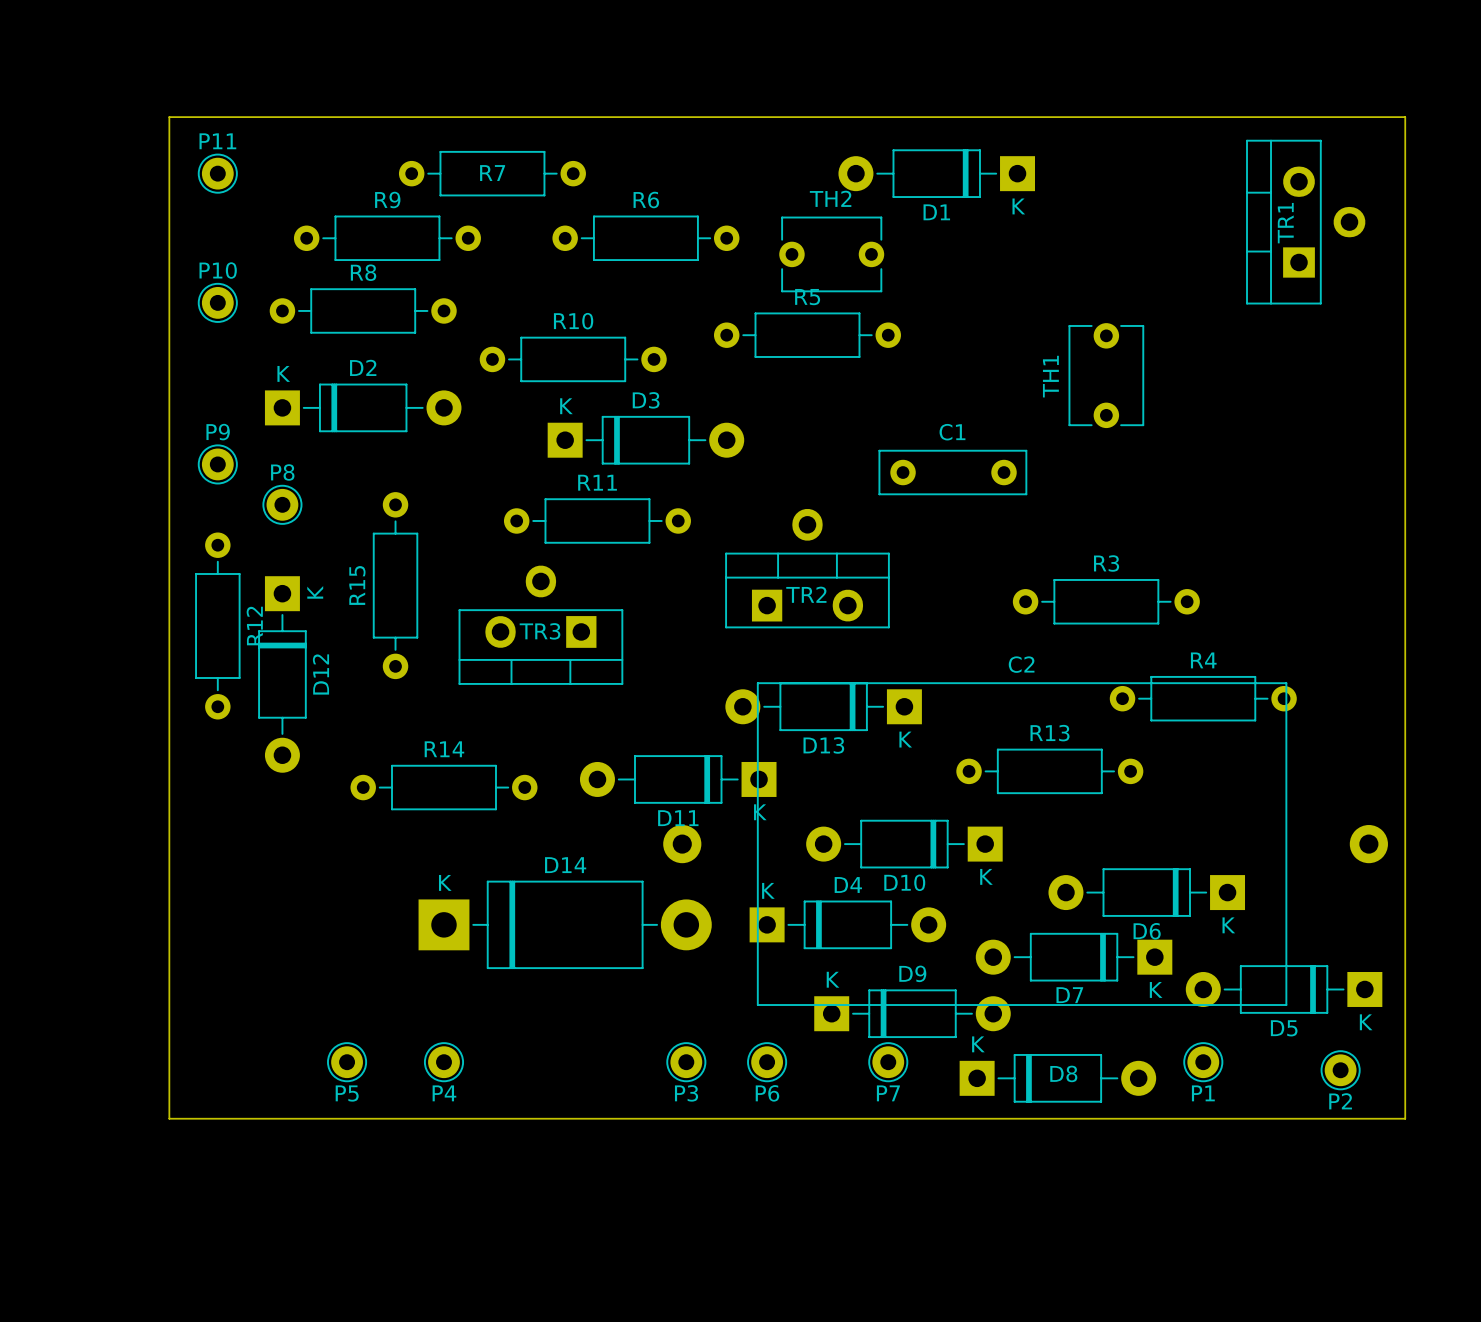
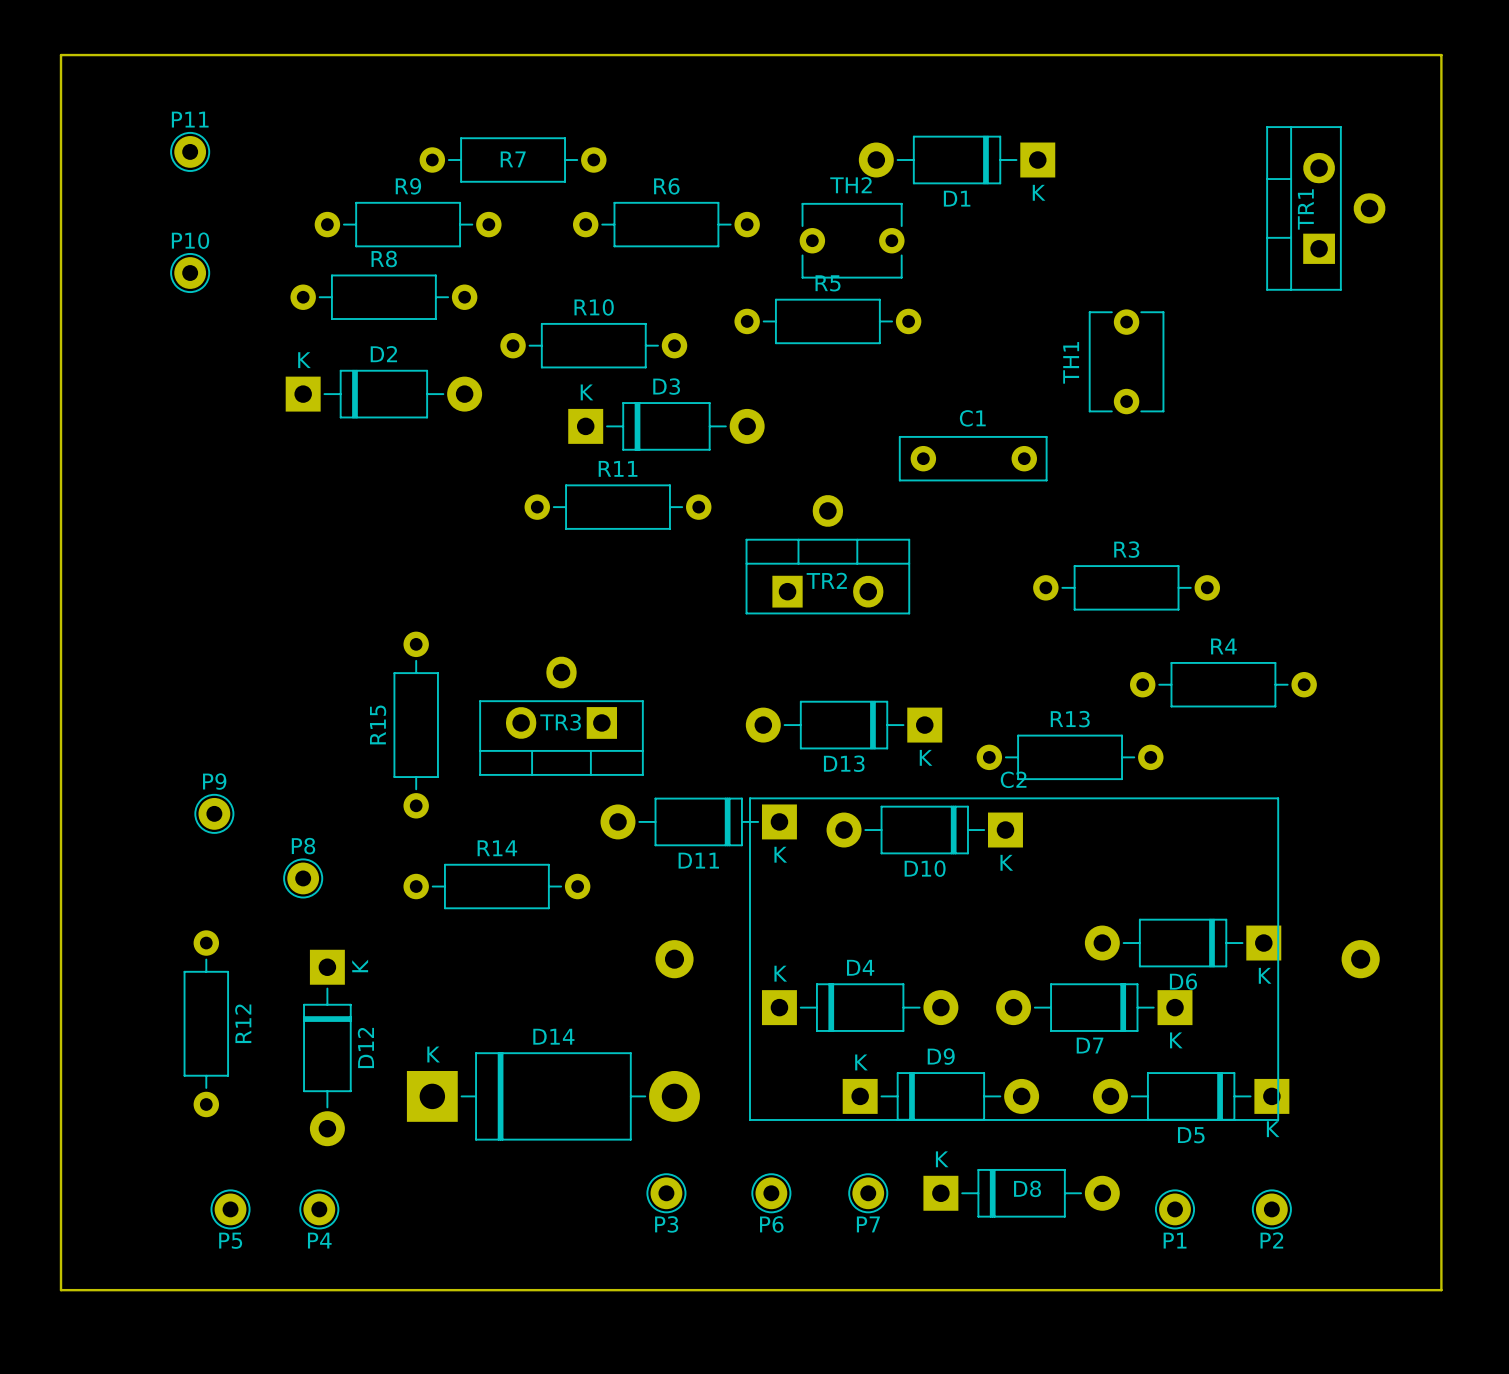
board edge: (169, 117) (169, 1118) (1405, 1118) (1405, 117) (169, 117) -> (61, 55) (61, 1290) (1441, 1290) (1441, 55) (61, 55)
P11 position: (217, 173) -> (190, 151)
P10 position: (217, 302) -> (190, 273)
P9 position: (217, 464) -> (214, 813)
P8 position: (282, 504) -> (303, 878)
R15 position: (395, 585) -> (416, 725)
R12 position: (217, 625) -> (206, 1023)
TR3 position: (540, 625) -> (561, 716)
D12 position: (282, 674) -> (327, 1047)
D13 position: (823, 706) -> (844, 725)
D11 position: (678, 779) -> (698, 821)
R14 position: (443, 787) -> (496, 886)
C2 position: (1025, 844) -> (1017, 959)
D6 position: (1146, 892) -> (1183, 943)
D14 position: (565, 924) -> (553, 1096)
D4 position: (847, 924) -> (860, 1007)
D7 position: (1074, 957) -> (1094, 1007)
D5 position: (1284, 989) -> (1191, 1096)
D9 position: (912, 1013) -> (940, 1096)
P5 position: (347, 1062) -> (230, 1209)
P4 position: (443, 1062) -> (319, 1209)
P3 position: (686, 1062) -> (666, 1193)
P6 position: (767, 1062) -> (771, 1193)
P7 position: (888, 1062) -> (868, 1193)
P1 position: (1203, 1062) -> (1175, 1209)
P2 position: (1340, 1070) -> (1271, 1209)
D8 position: (1057, 1078) -> (1021, 1193)

